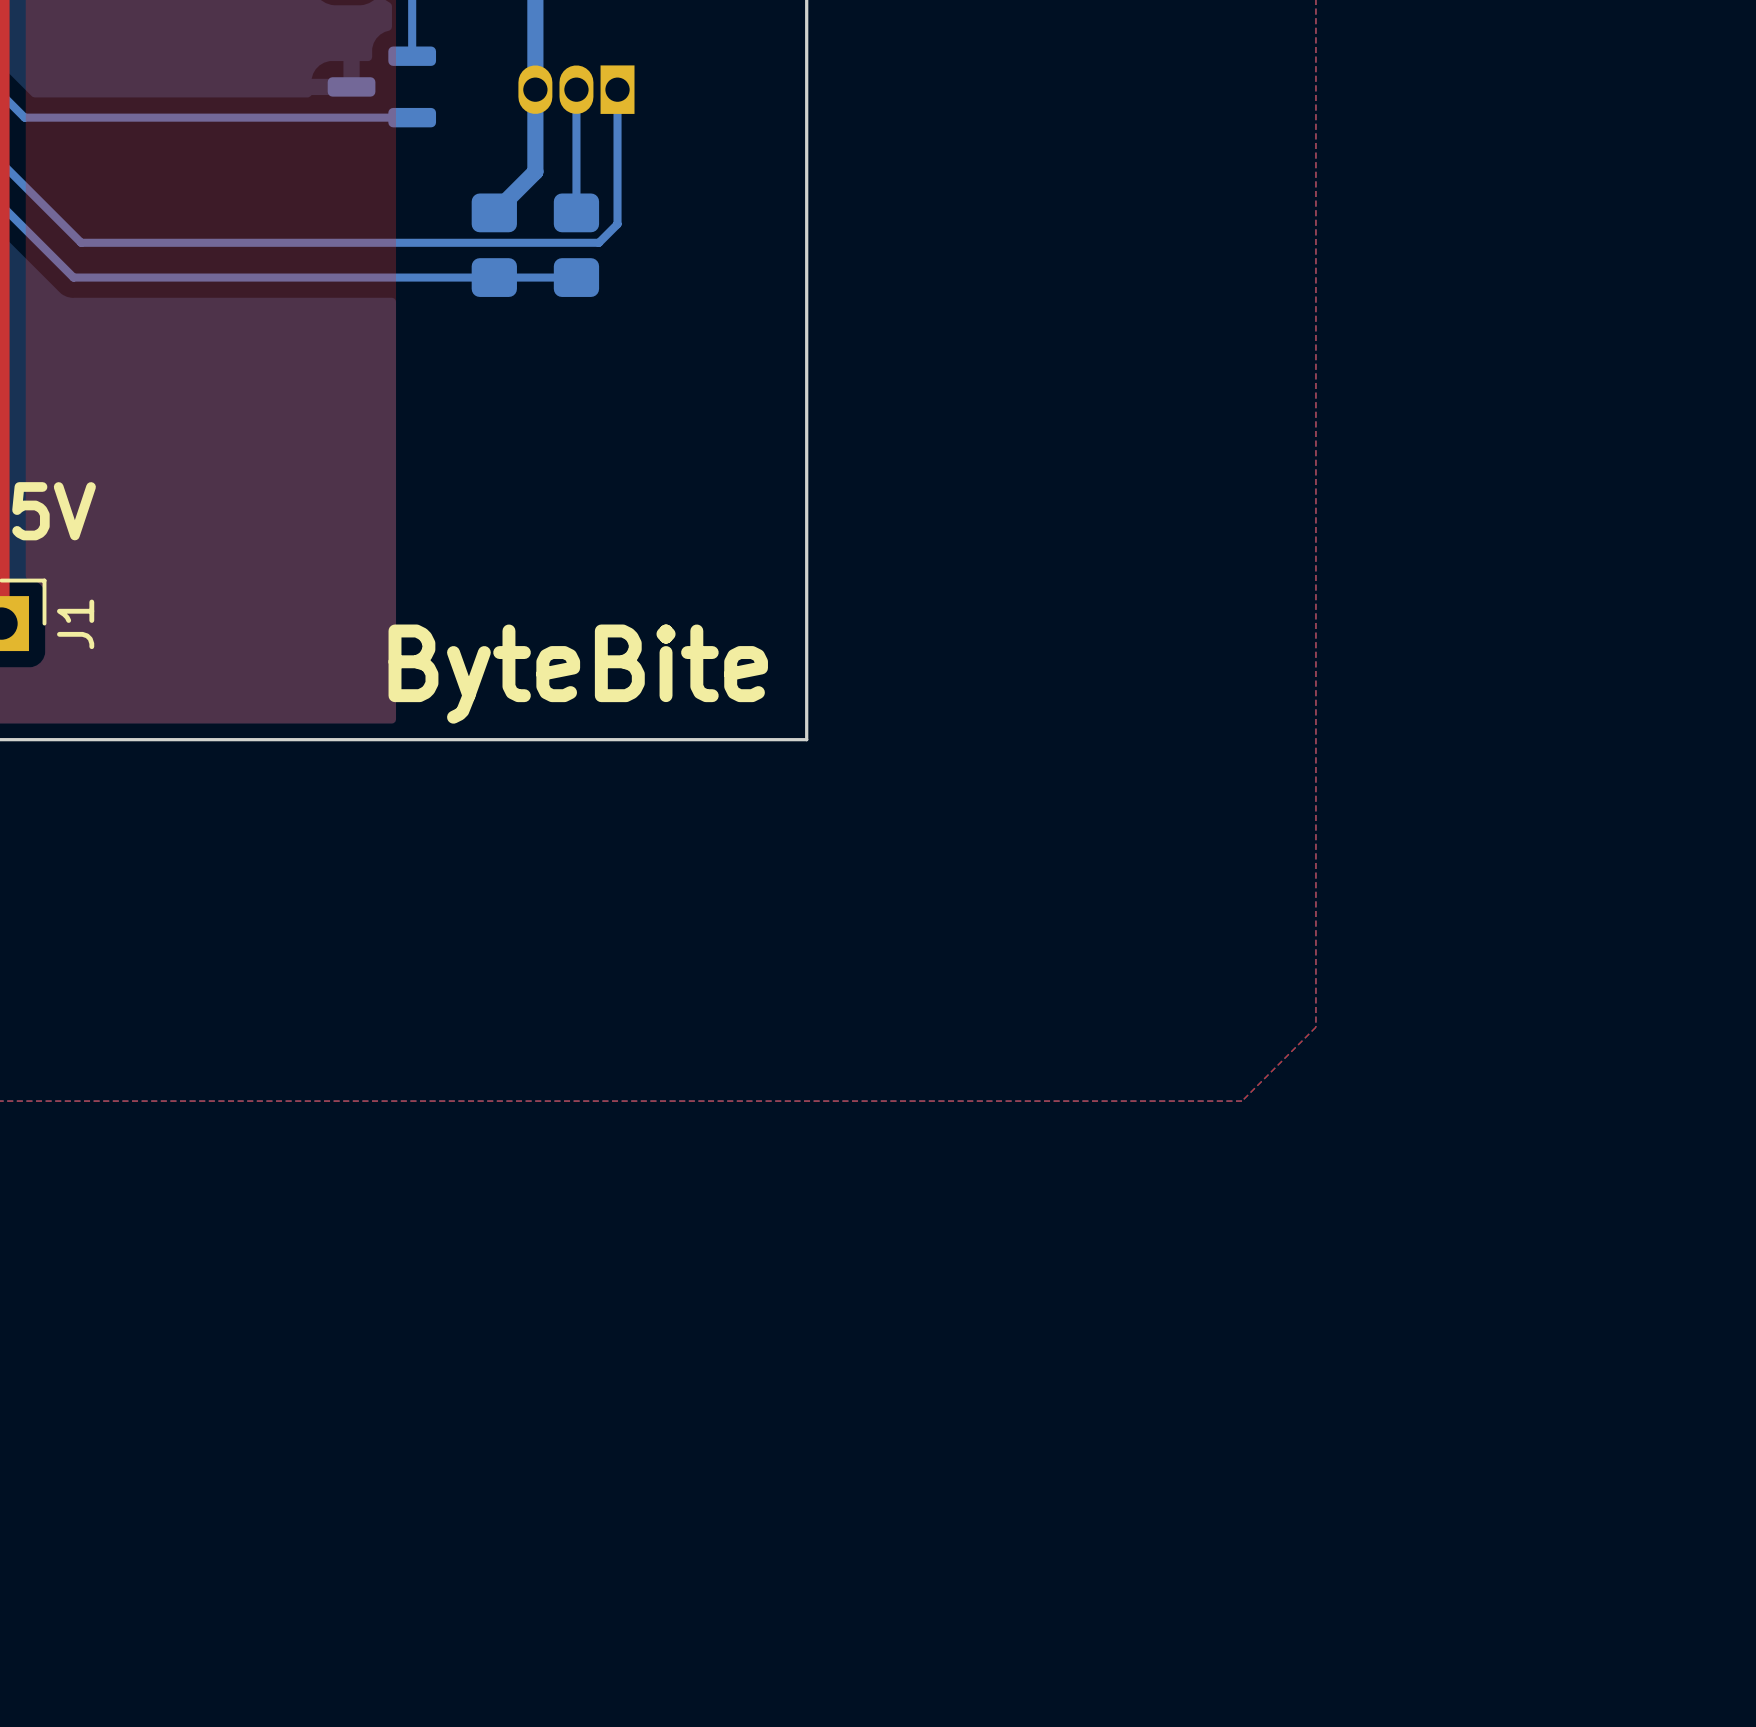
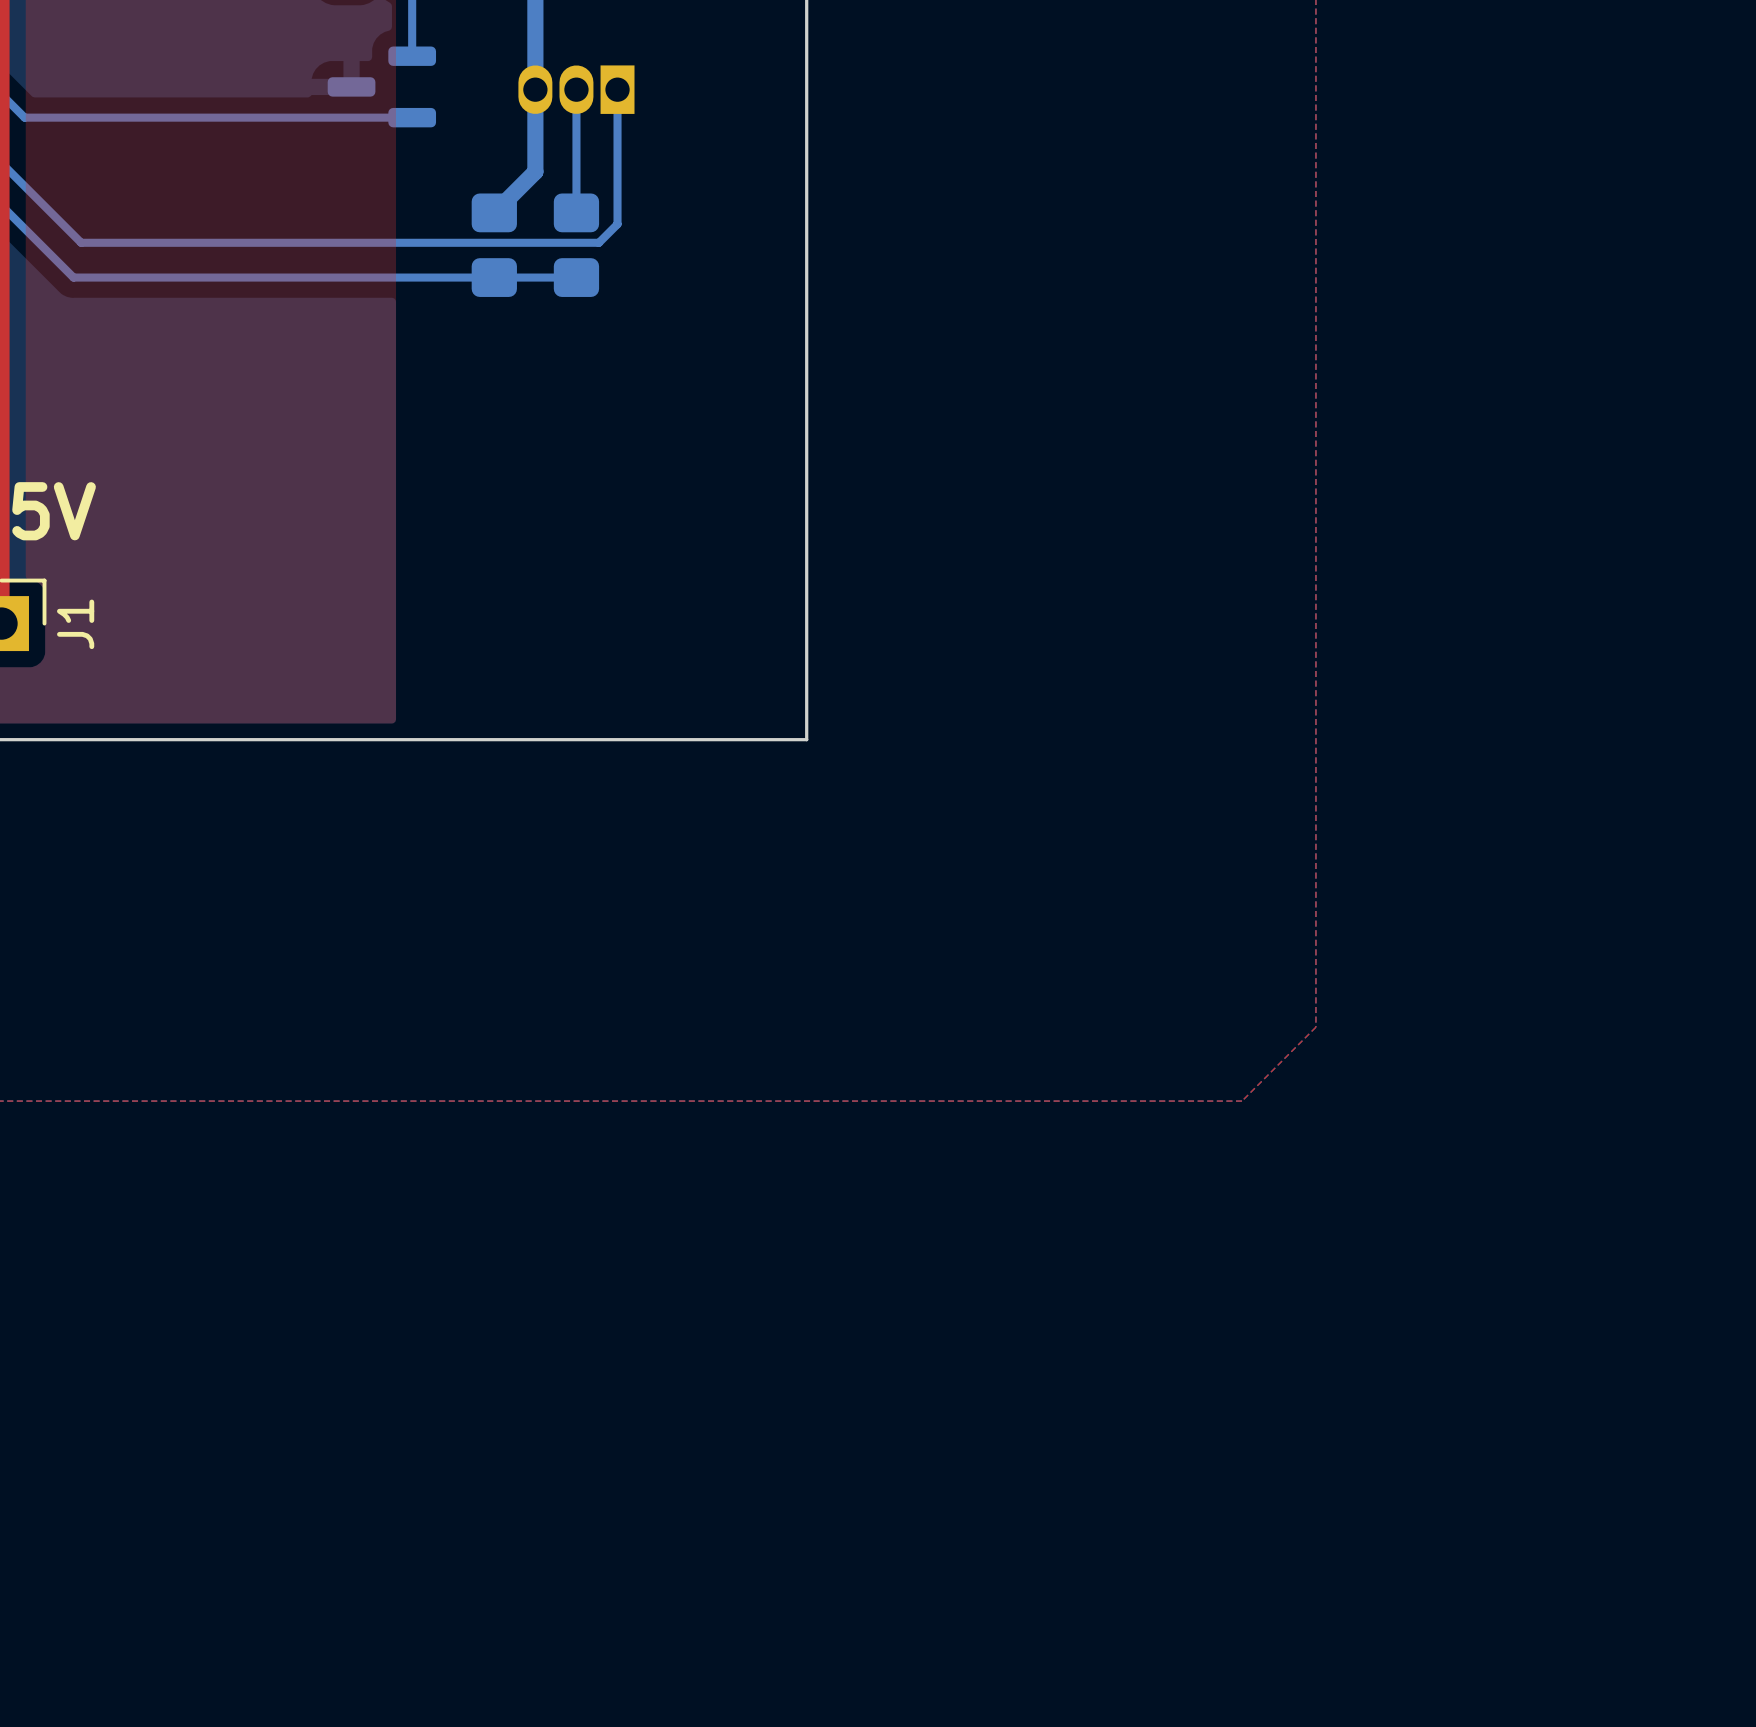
text: ByteBite (578, 674) -> none

